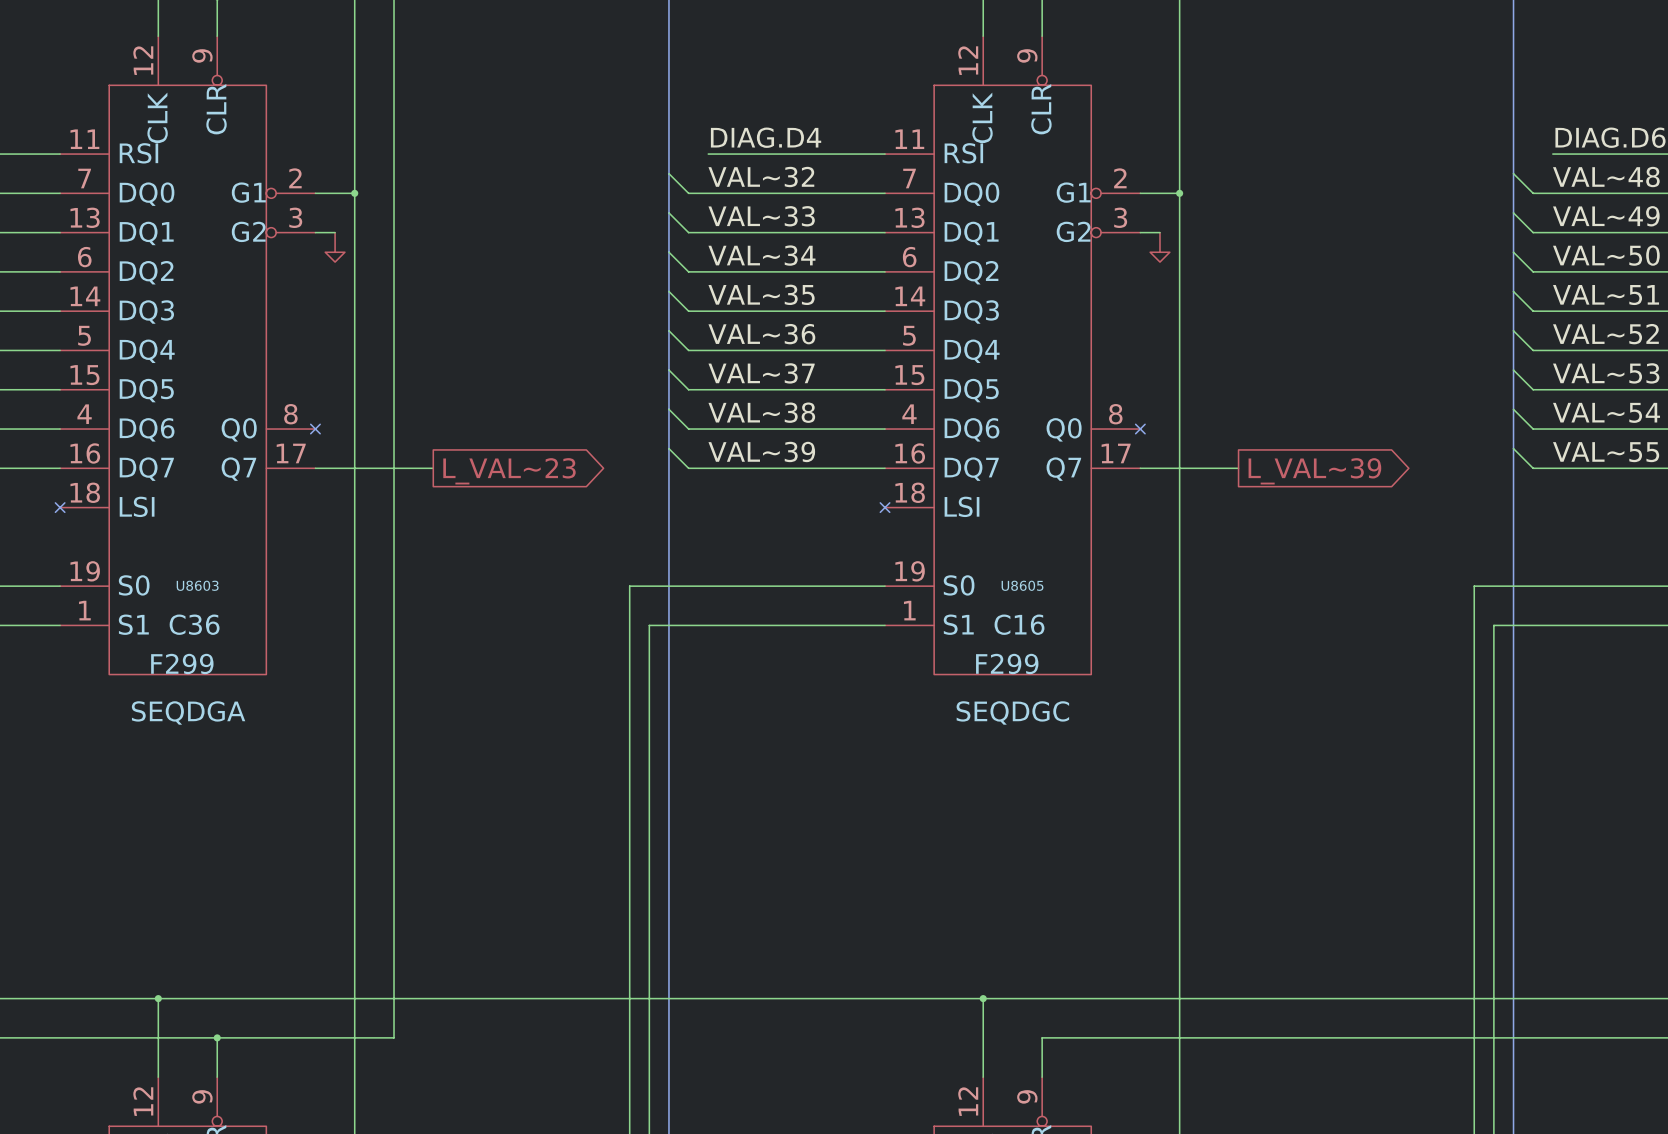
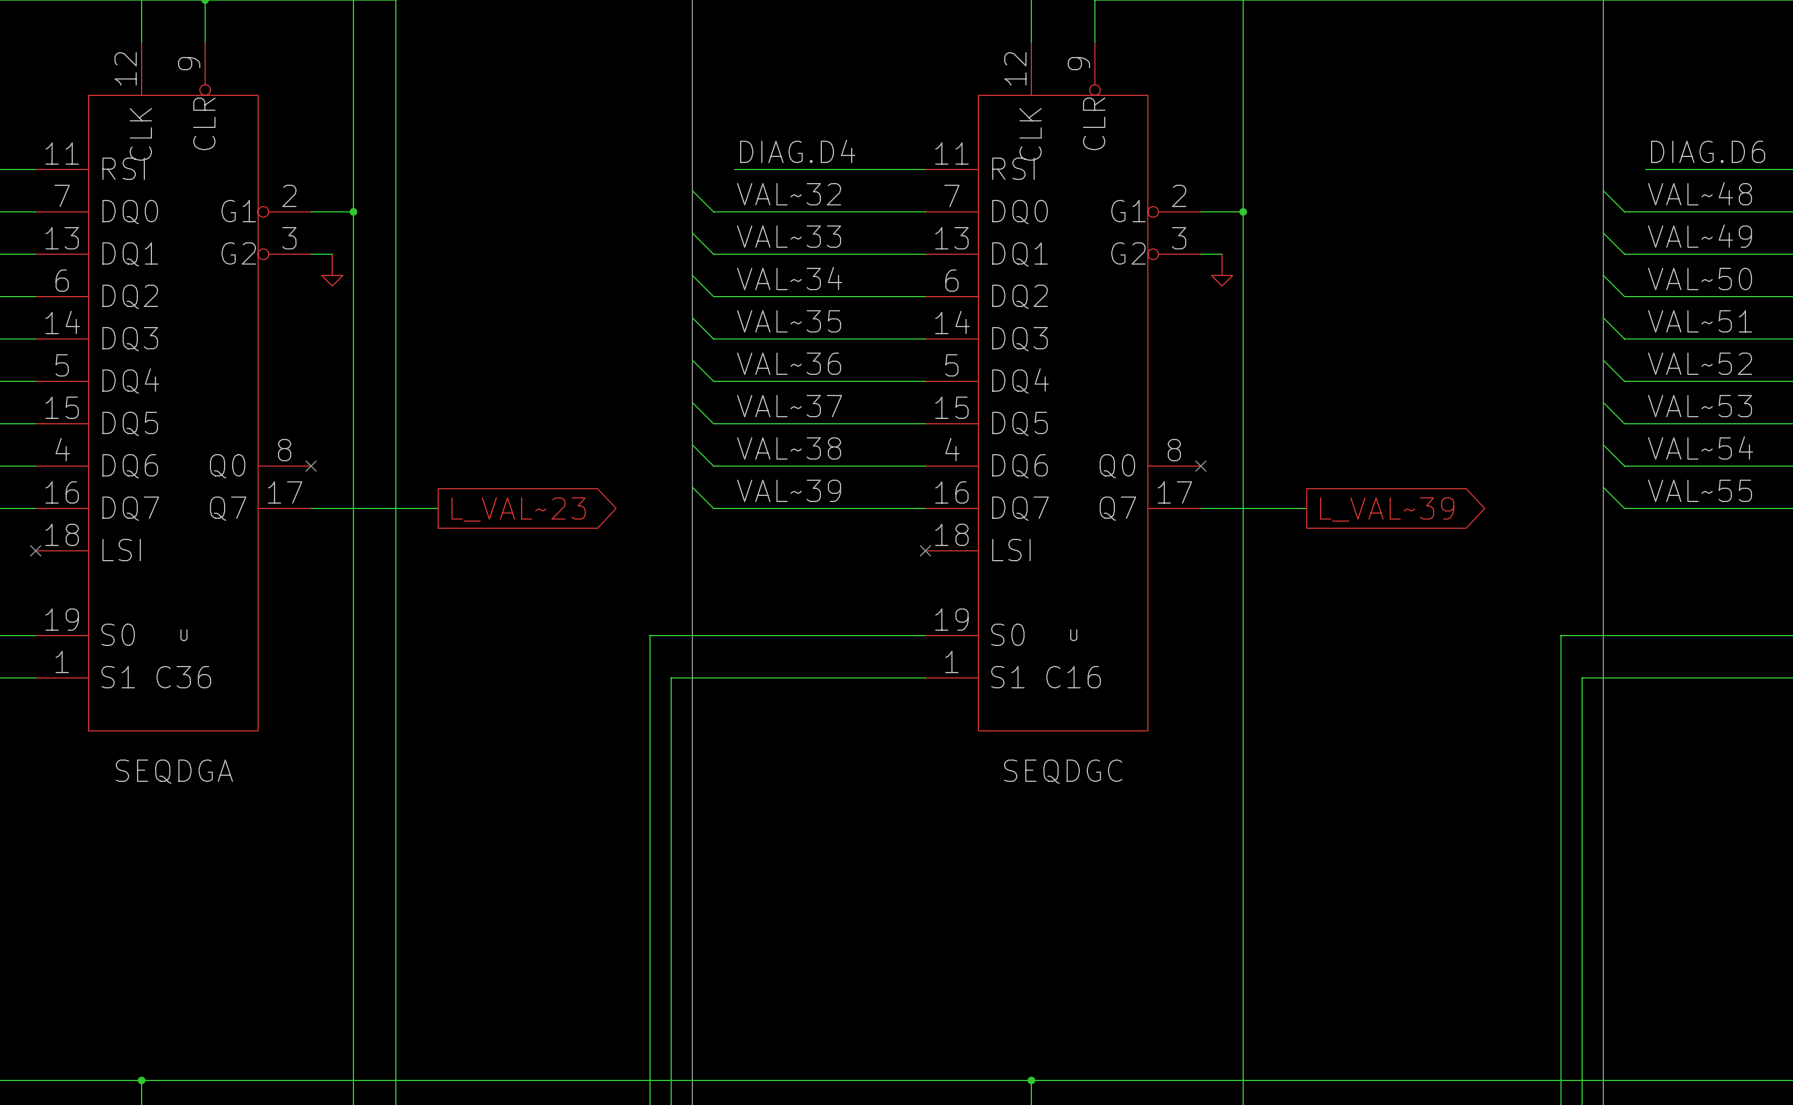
U8603 name: U8603 (197, 585) -> U (183, 635)
U8605 name: U8605 (1022, 585) -> U (1073, 635)
U8603 value: F299 (182, 663) -> none
U8605 value: F299 (1007, 663) -> none

